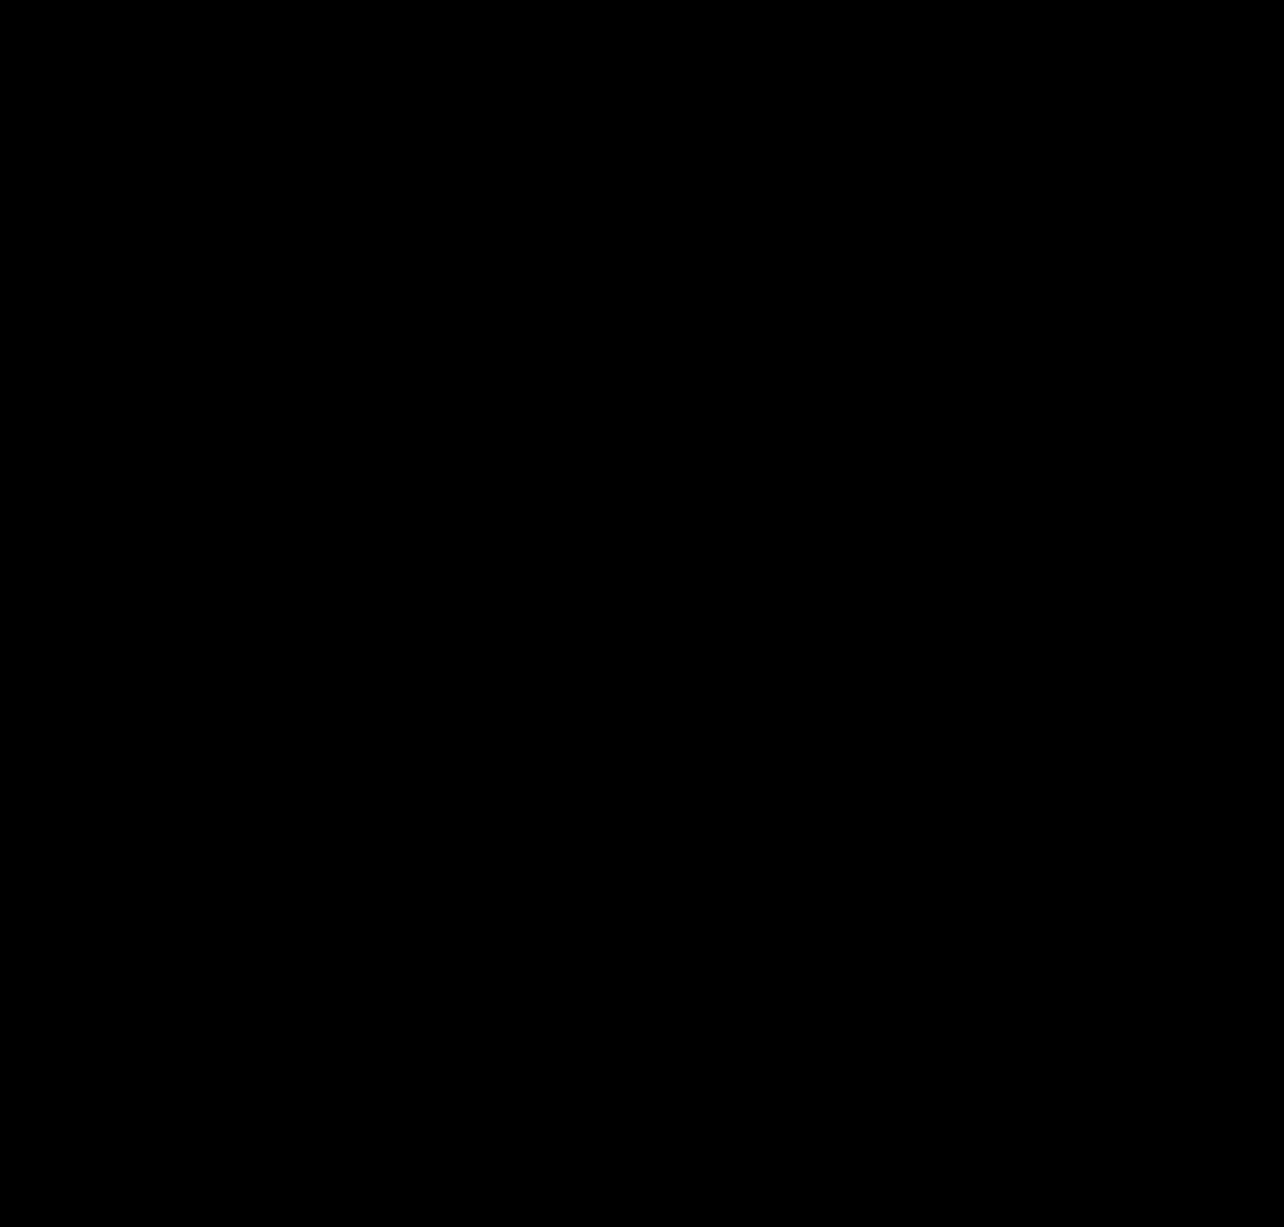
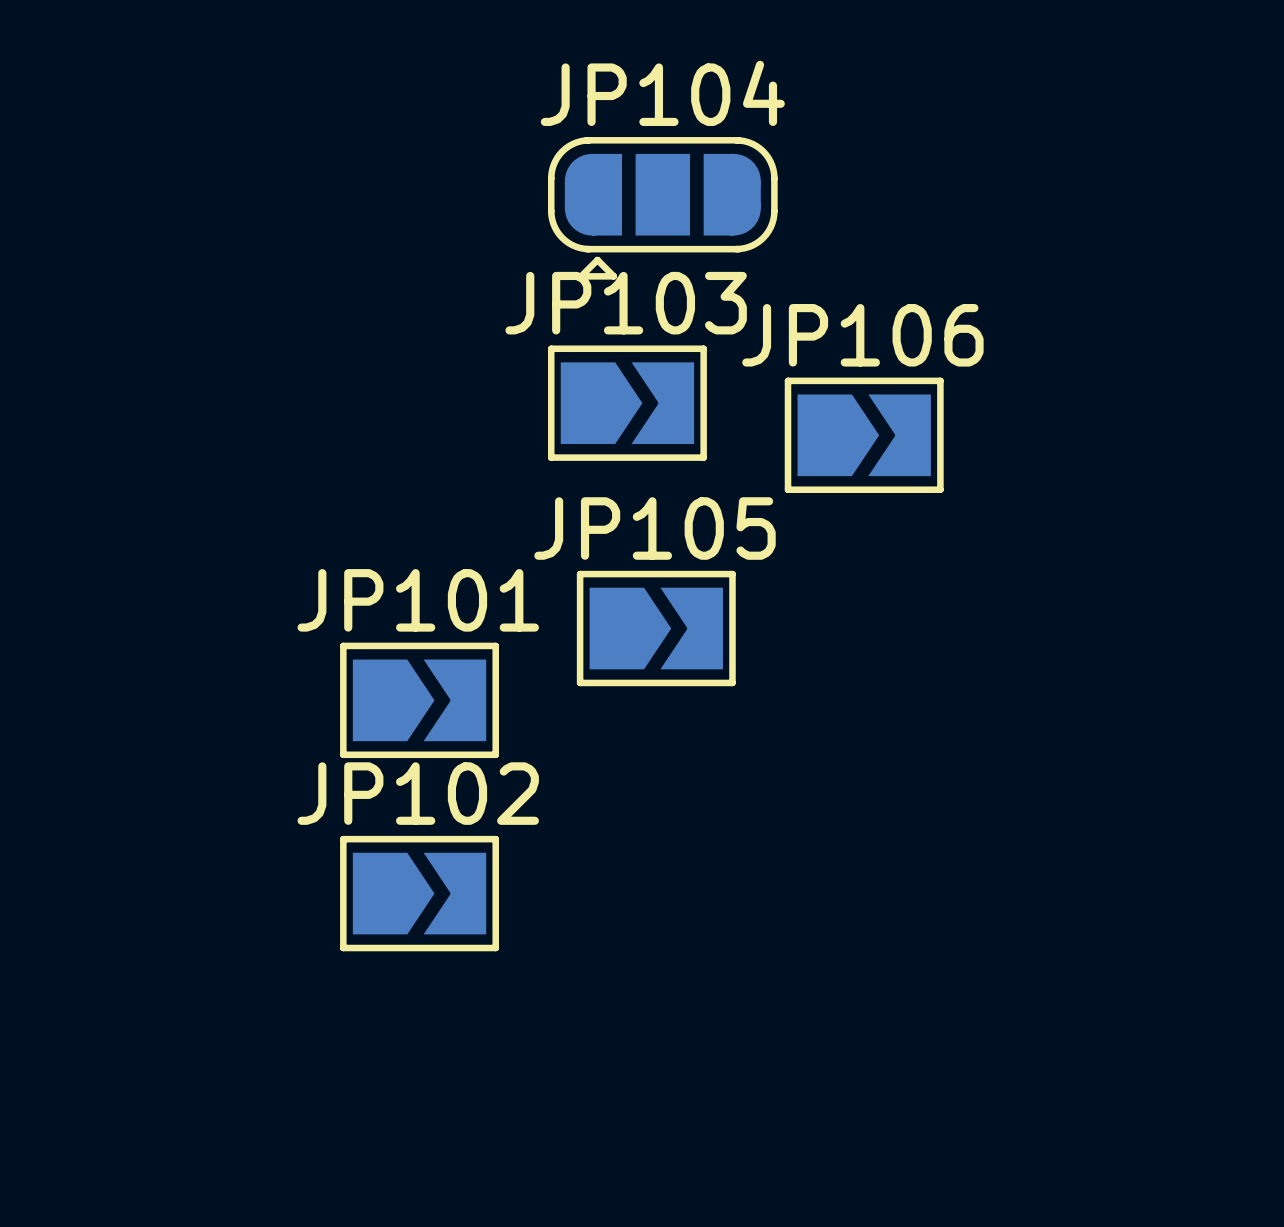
JP104: none -> (662, 208)
JP103: none -> (627, 403)
JP106: none -> (864, 435)
JP105: none -> (656, 628)
JP101: none -> (419, 700)
JP102: none -> (419, 893)

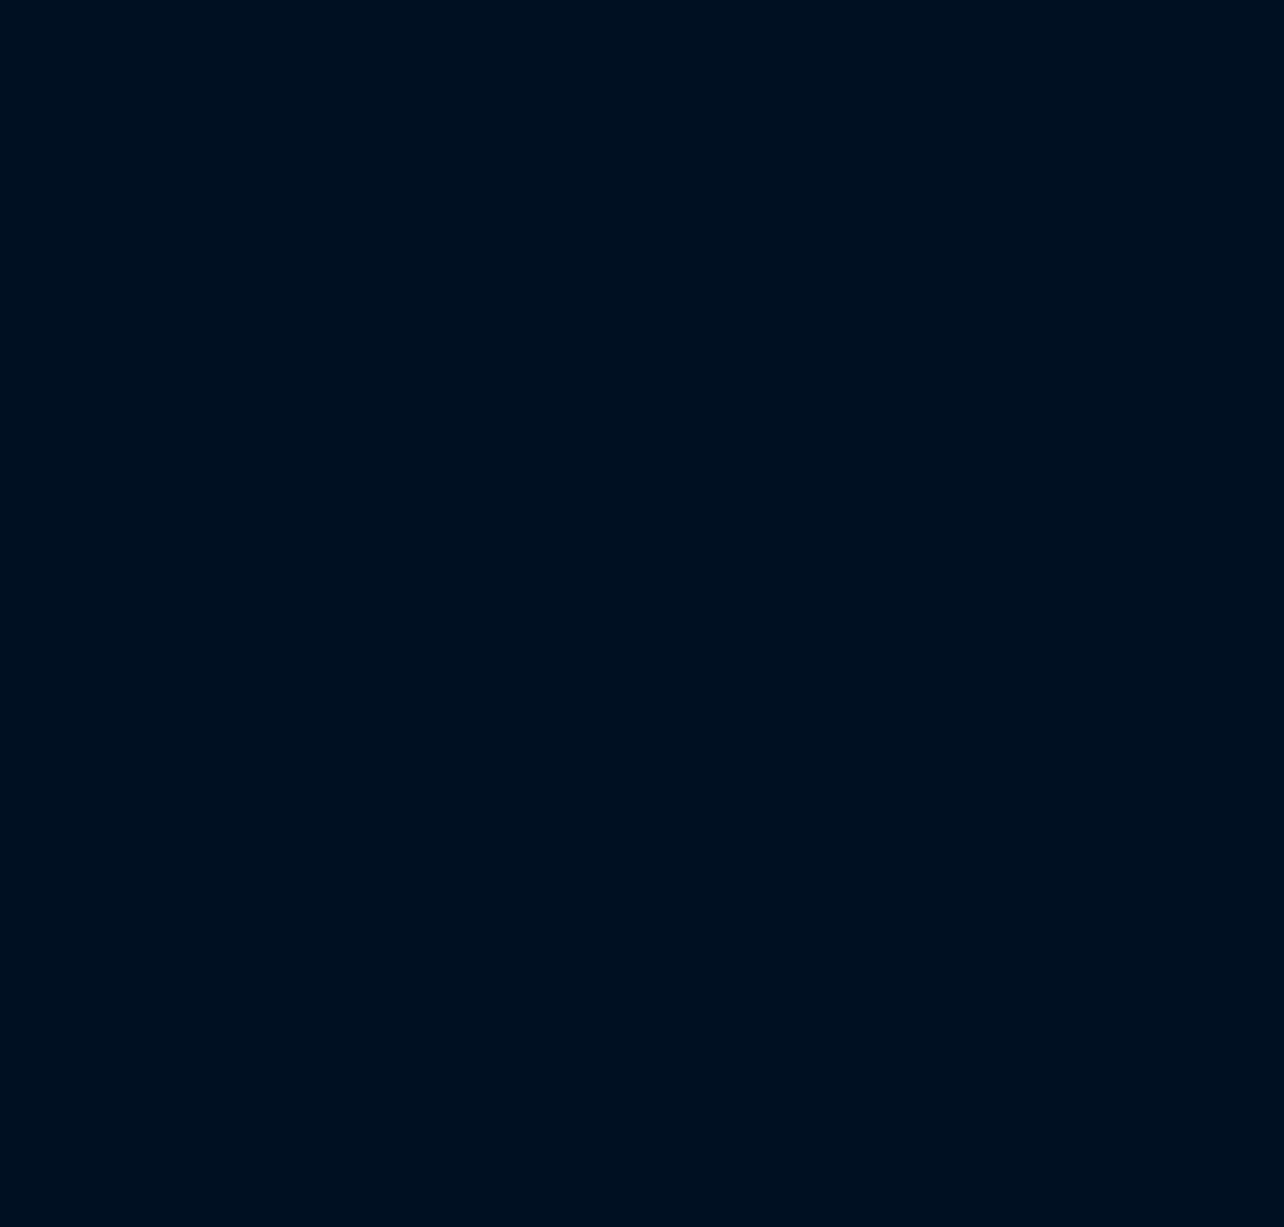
JP104: (662, 208) -> none
JP103: (627, 403) -> none
JP106: (864, 435) -> none
JP105: (656, 628) -> none
JP101: (419, 700) -> none
JP102: (419, 893) -> none

